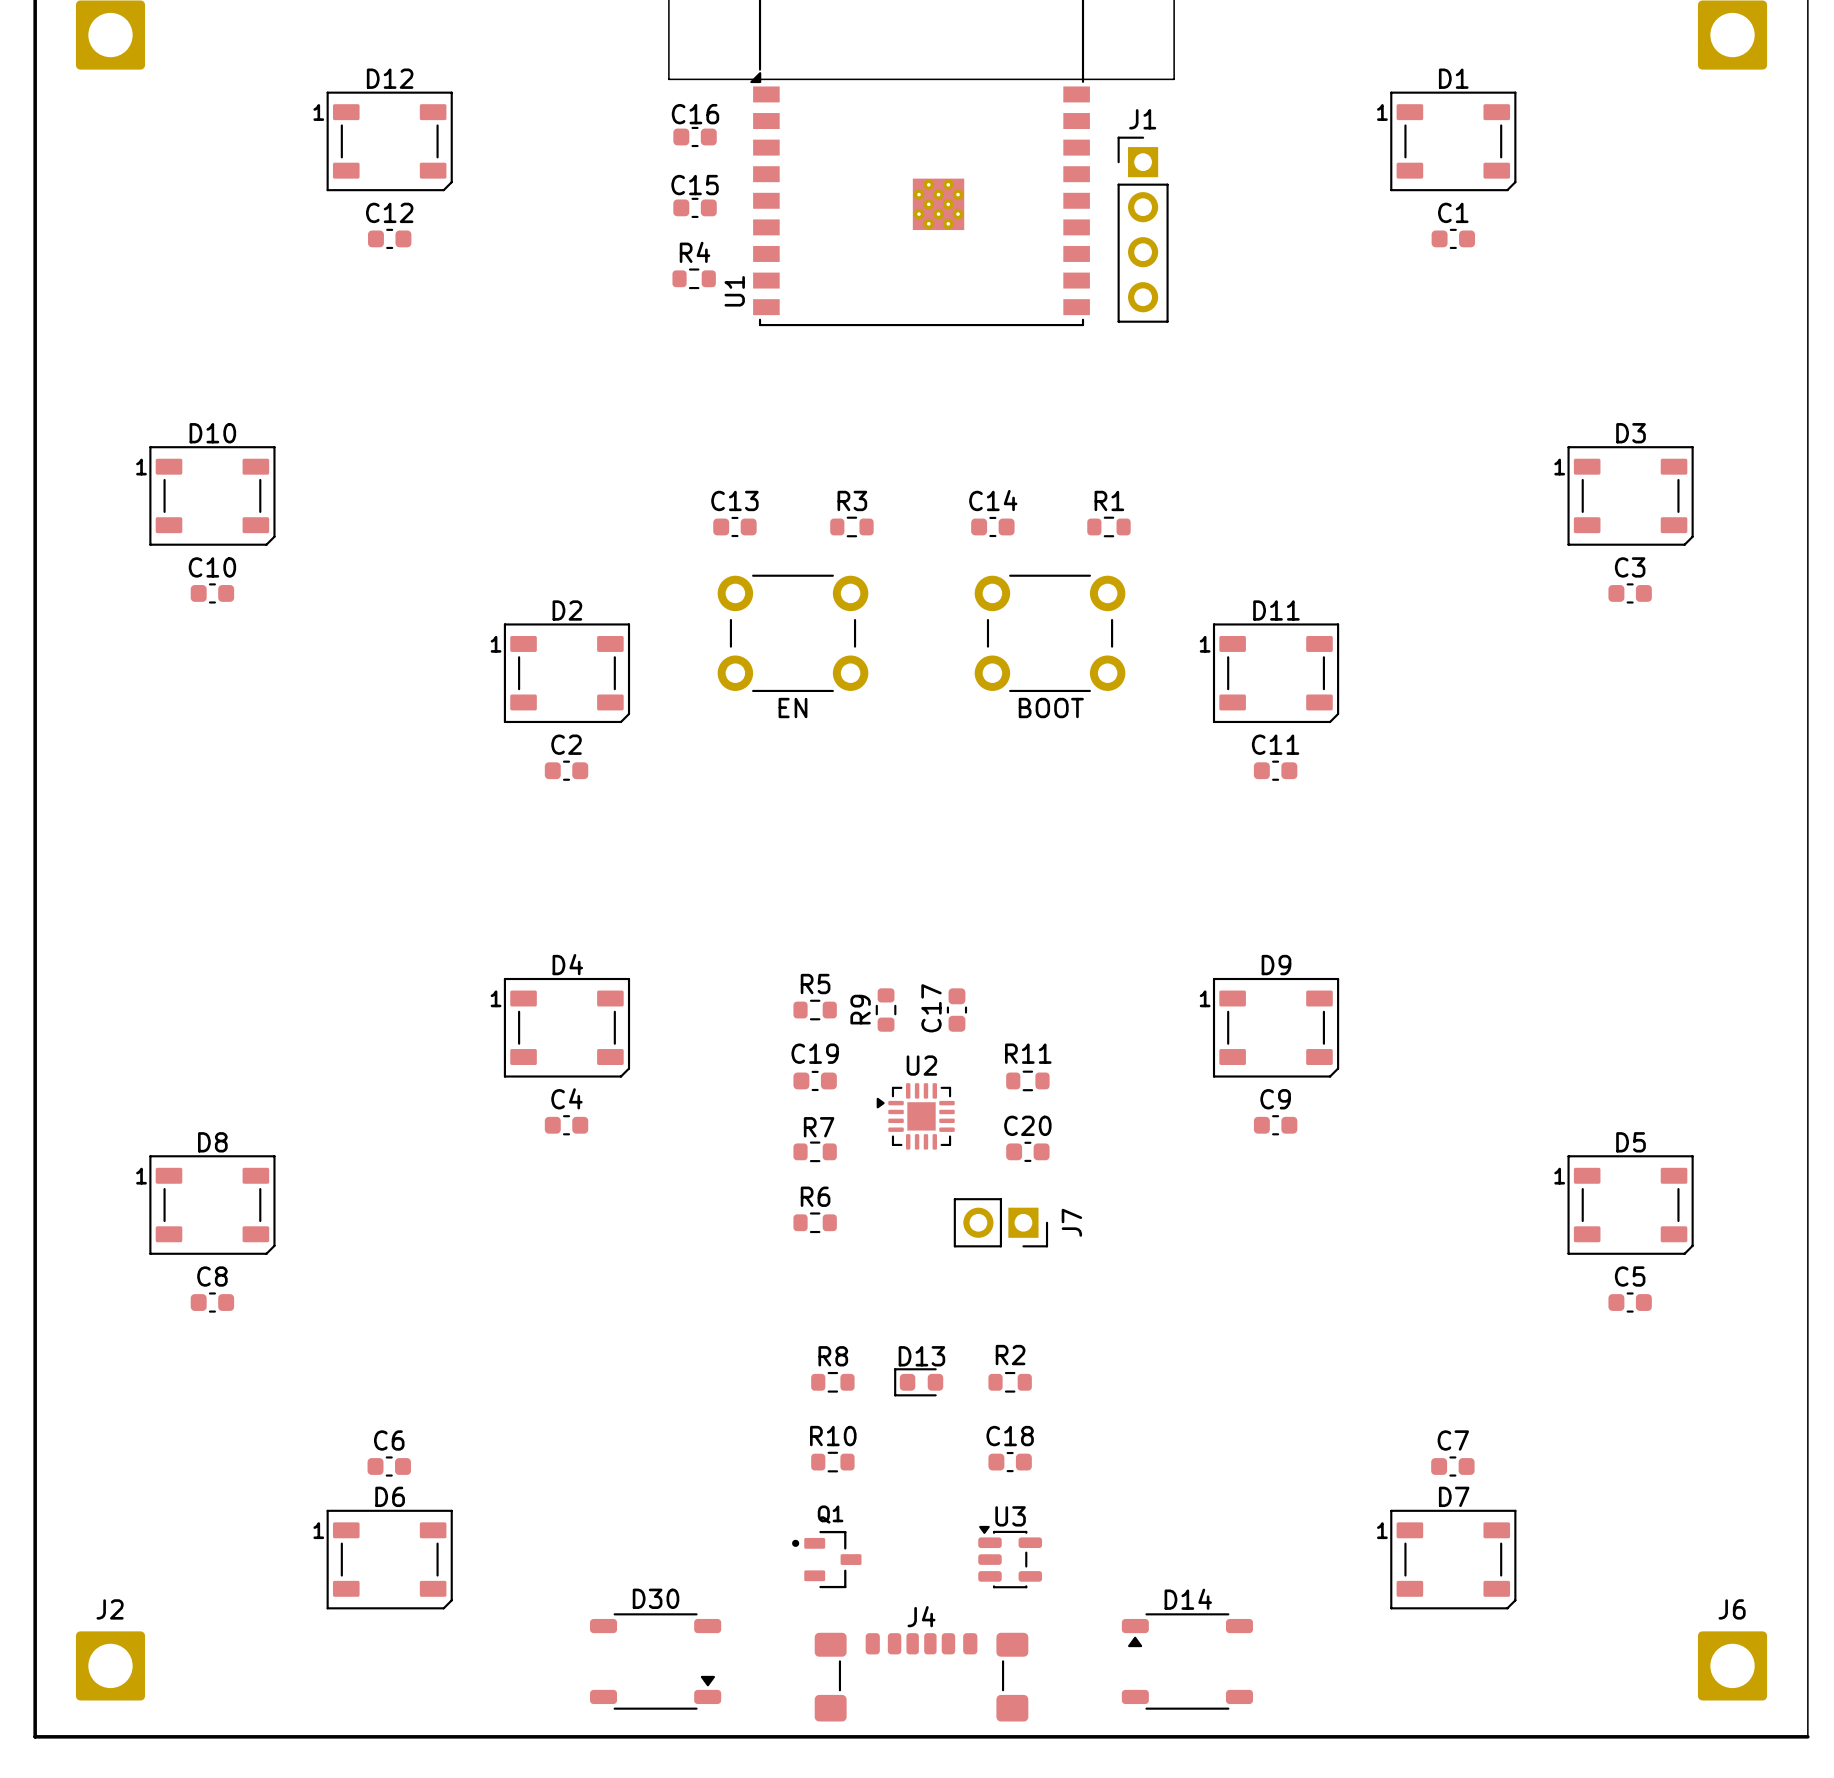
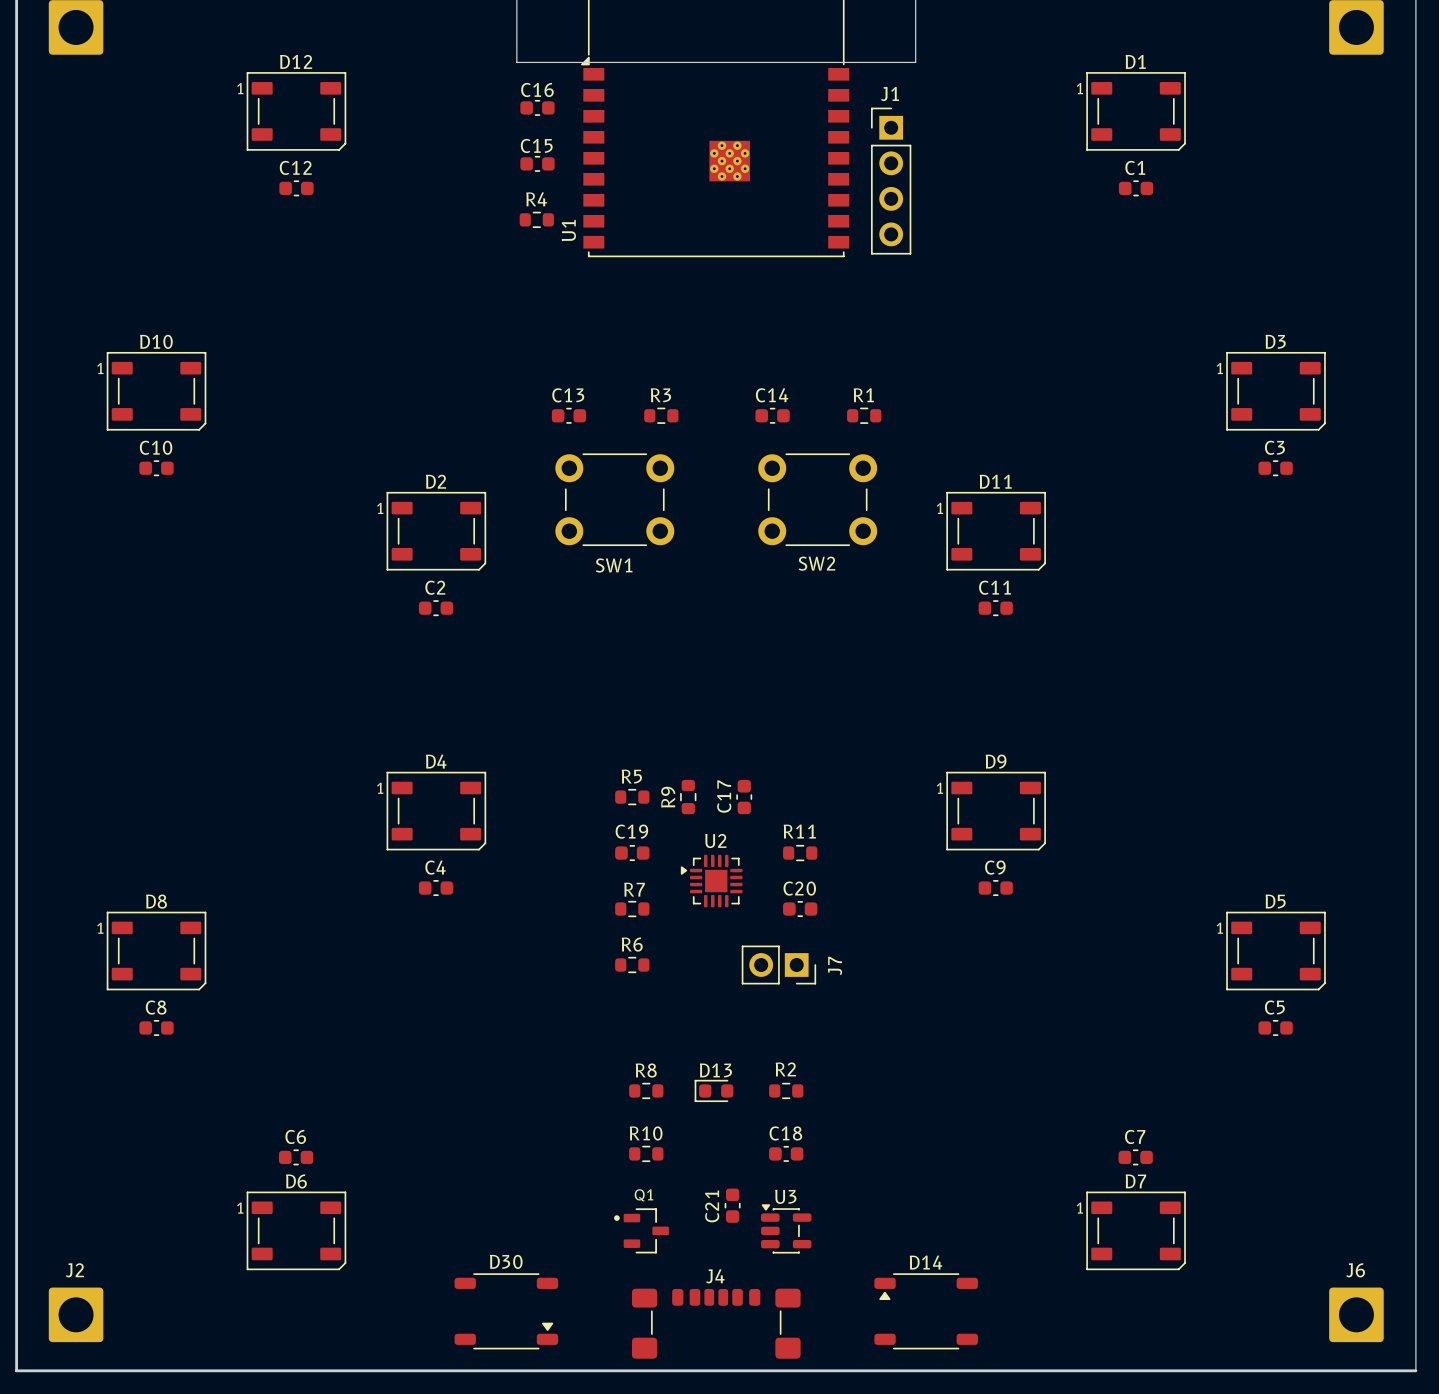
EN name: EN (792, 708) -> SW1 (614, 565)
BOOT name: BOOT (1051, 708) -> SW2 (816, 563)
C21: none -> (732, 1205)

